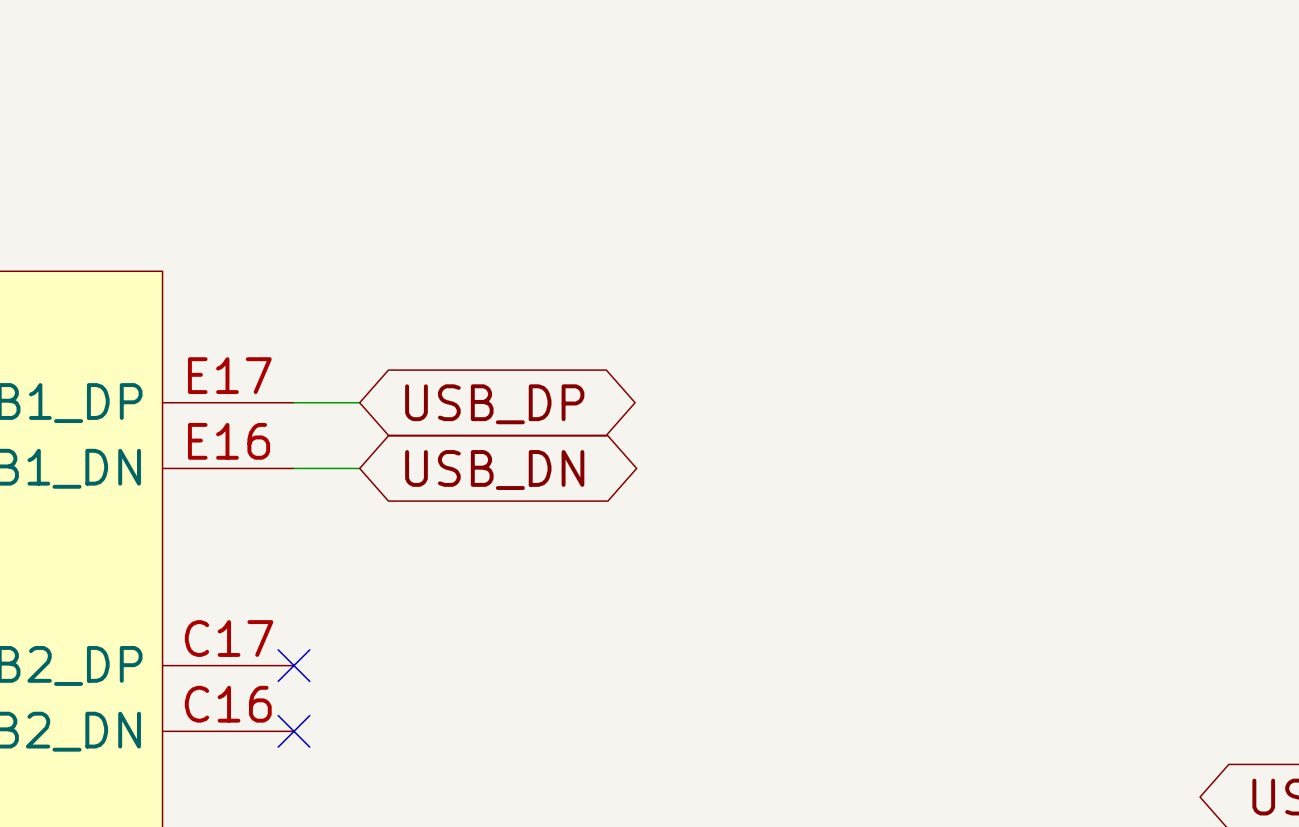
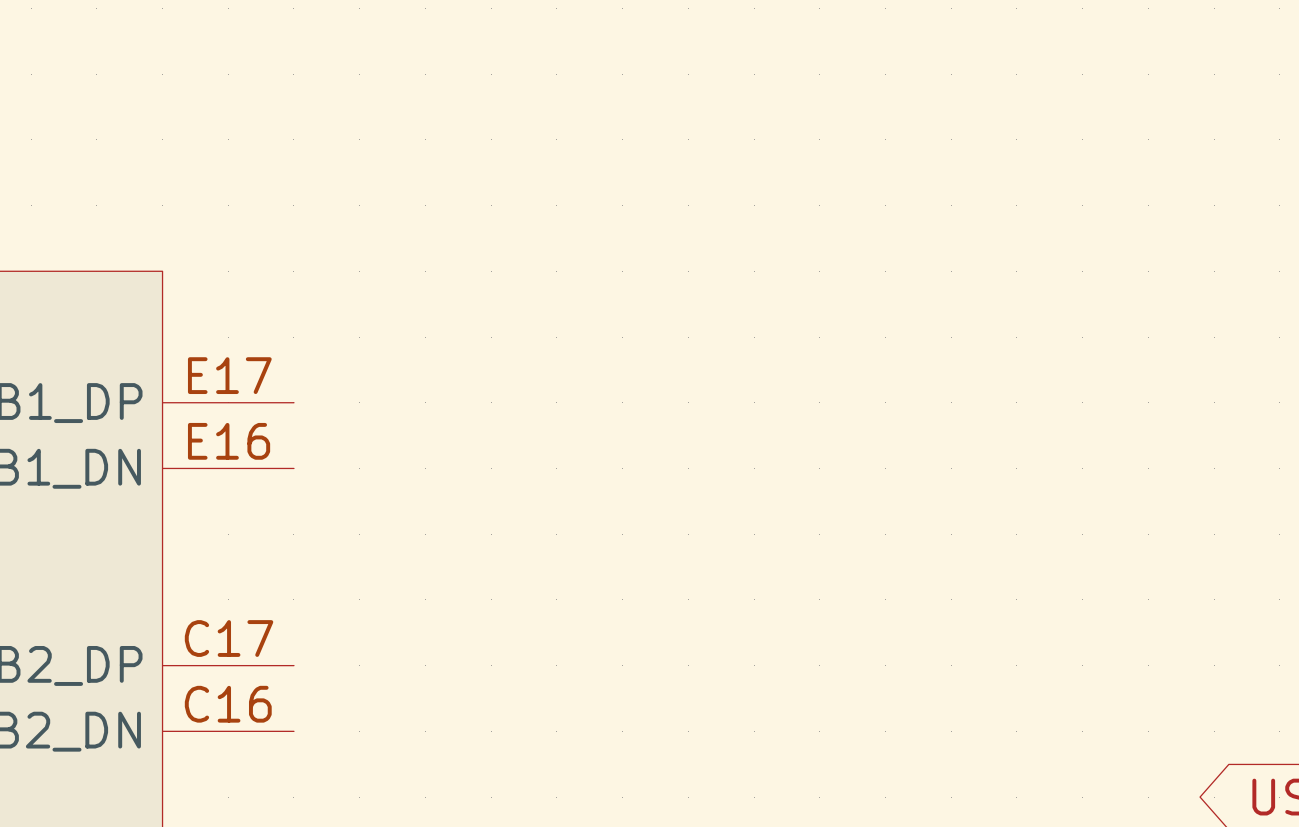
wire: (293, 402) (359, 402) -> none
global label: USB_DP (494, 404) -> none
wire: (293, 468) (359, 468) -> none
global label: USB_DN (494, 470) -> none
no-connect mark: (293, 665) -> none
no-connect mark: (293, 731) -> none

